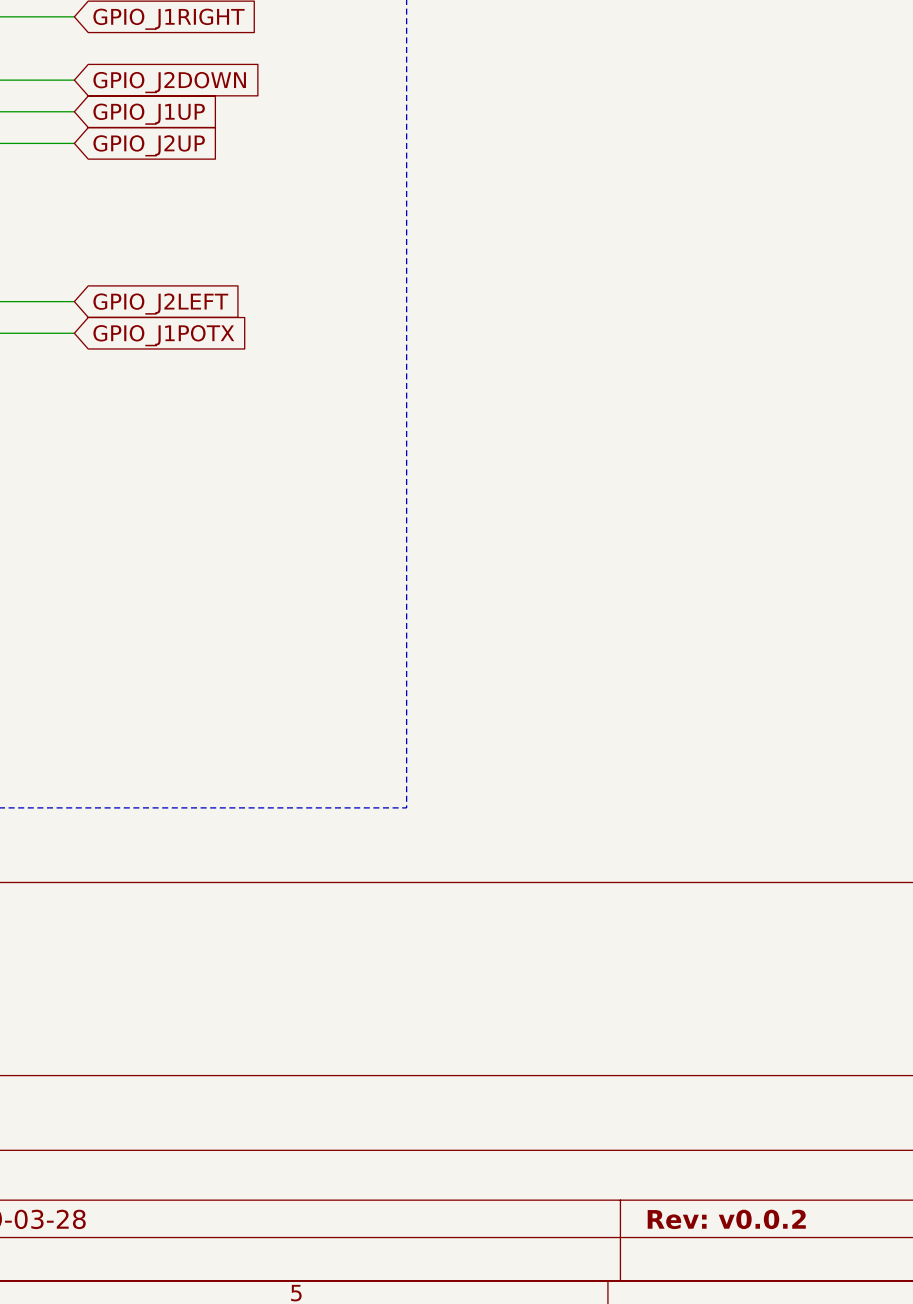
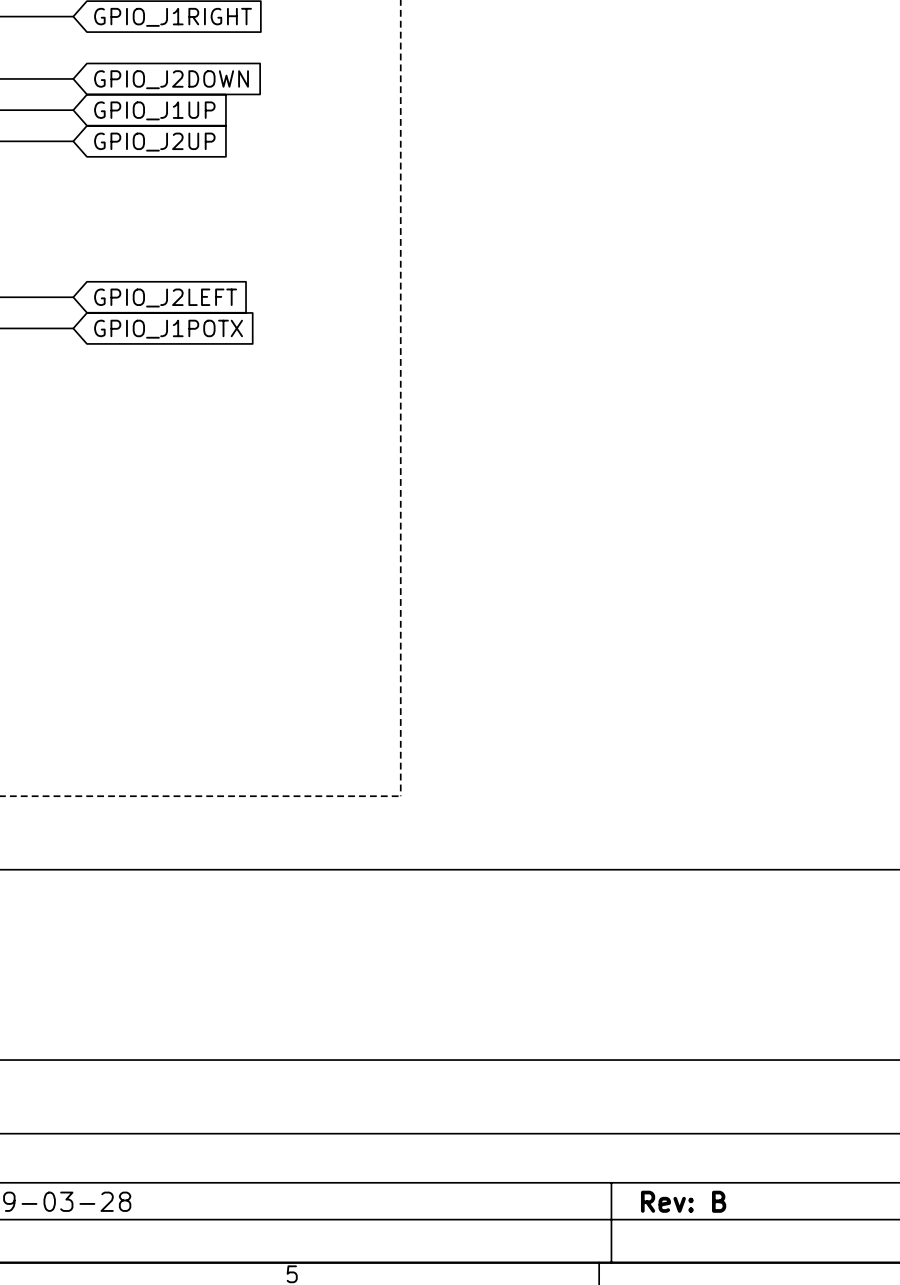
title block: Rev: v0.0.2 (726, 1219) -> Rev: B (683, 1201)

